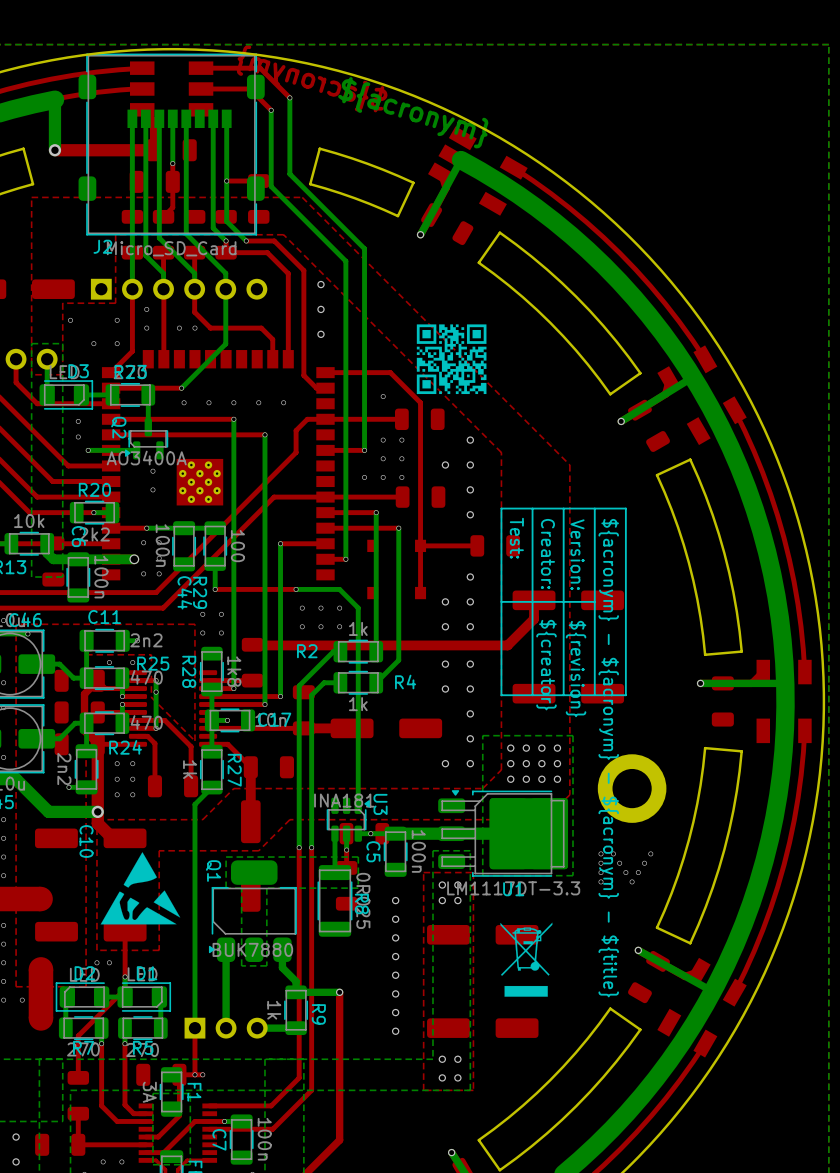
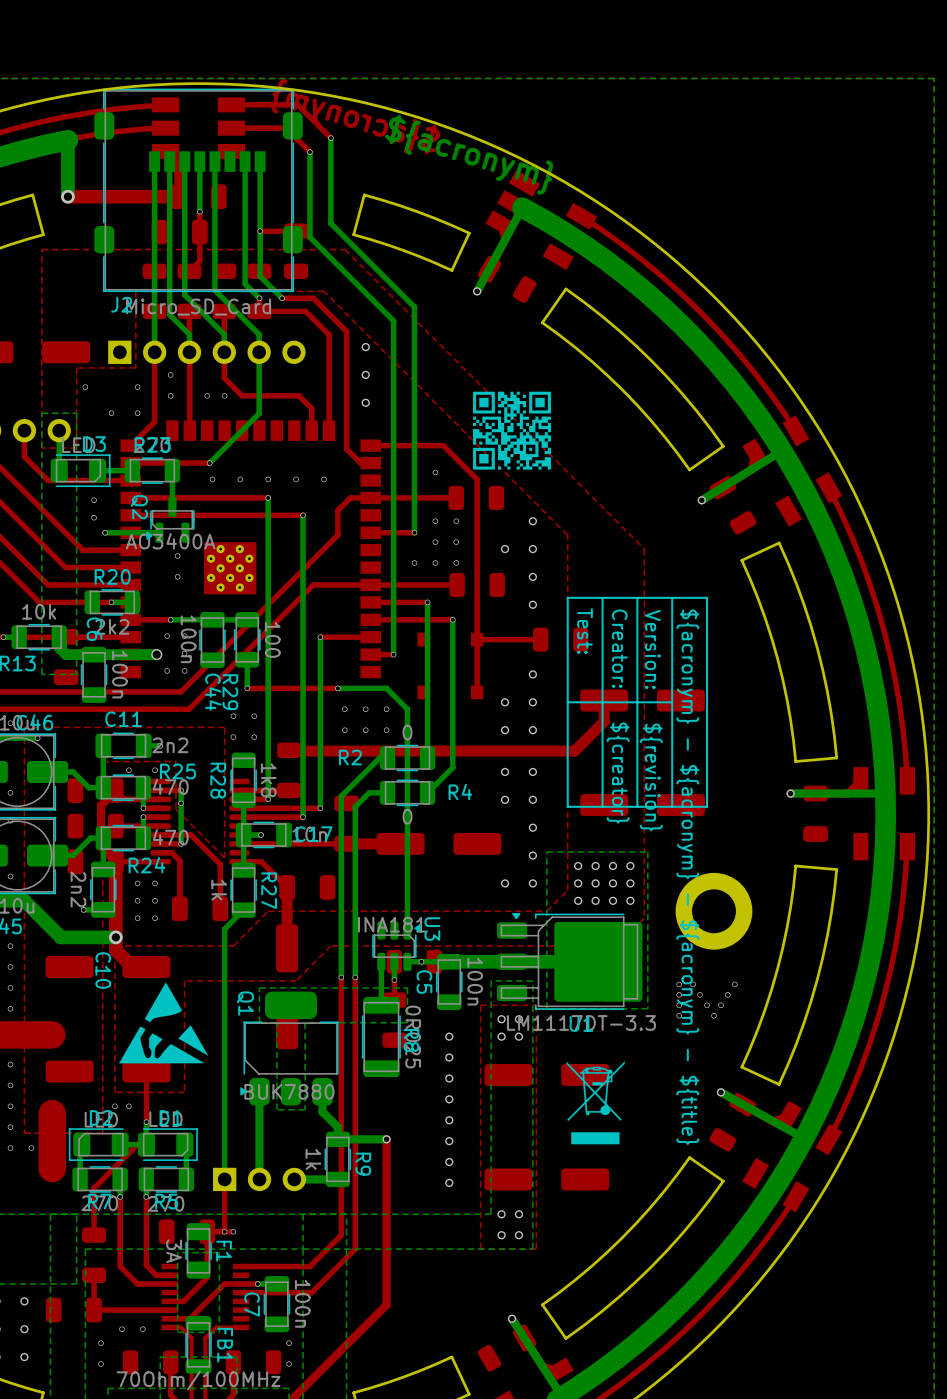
R2 value: 1k (358, 628) -> 0 (407, 732)
R4 value: 1k (358, 704) -> 0 (407, 816)

